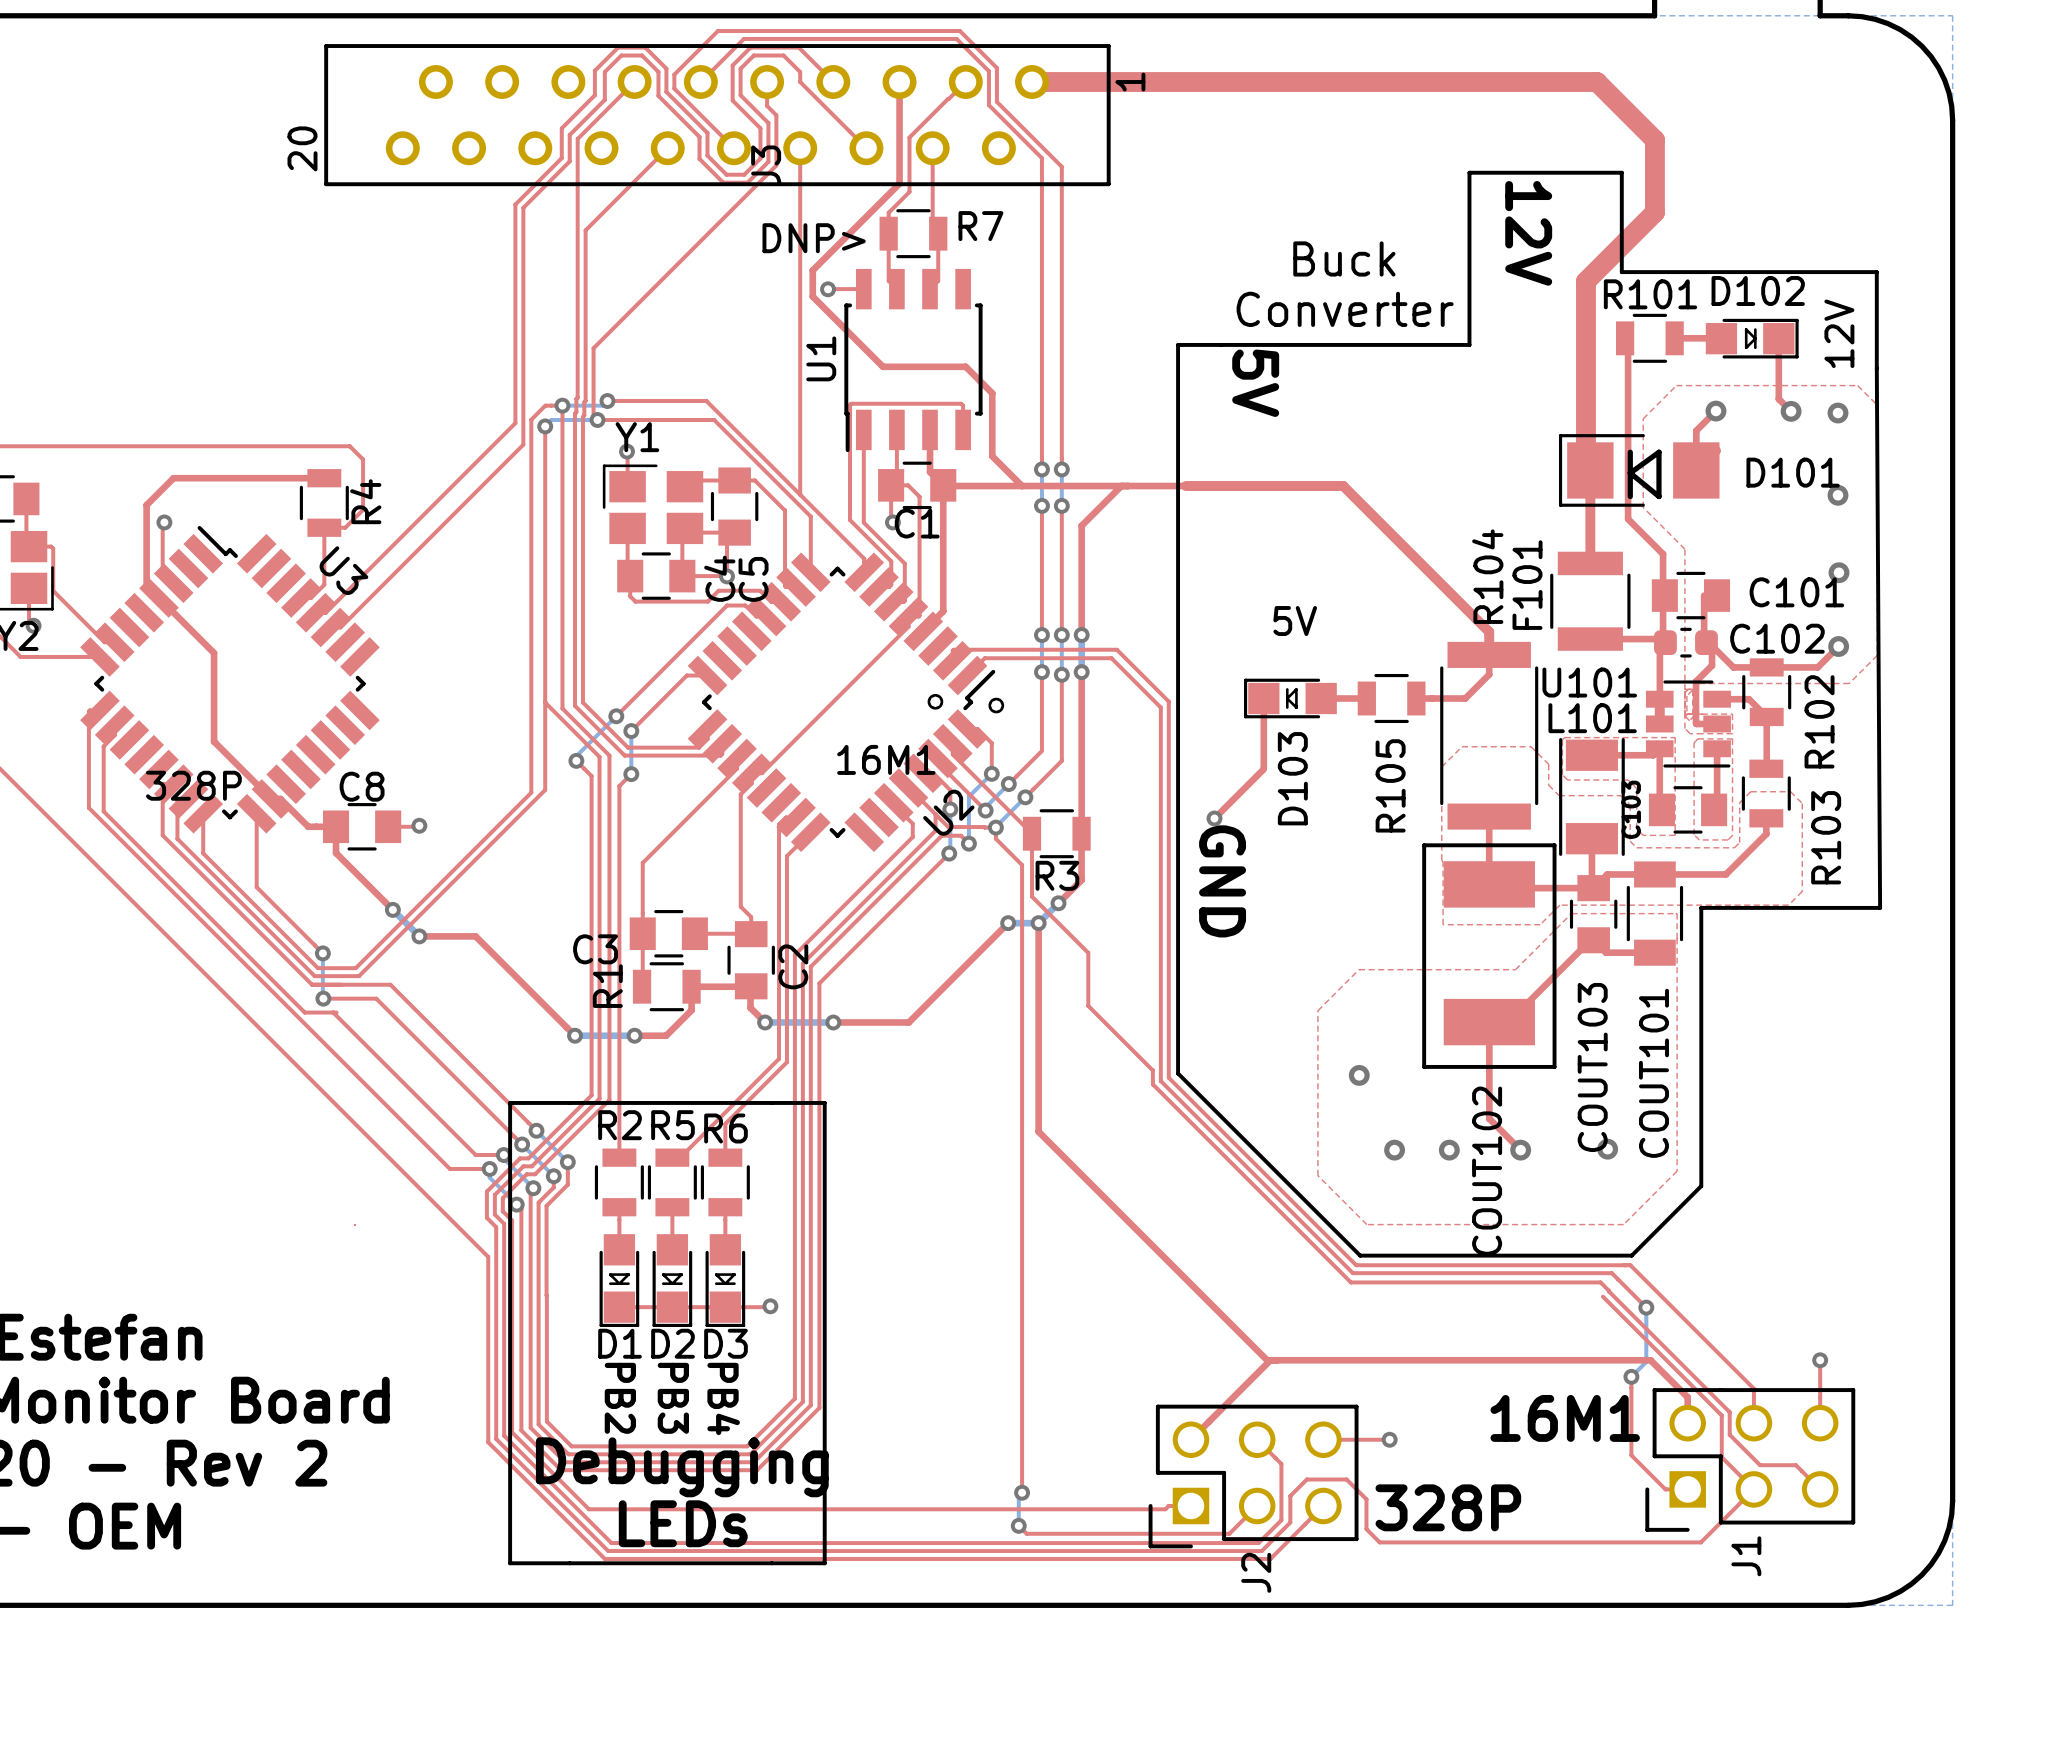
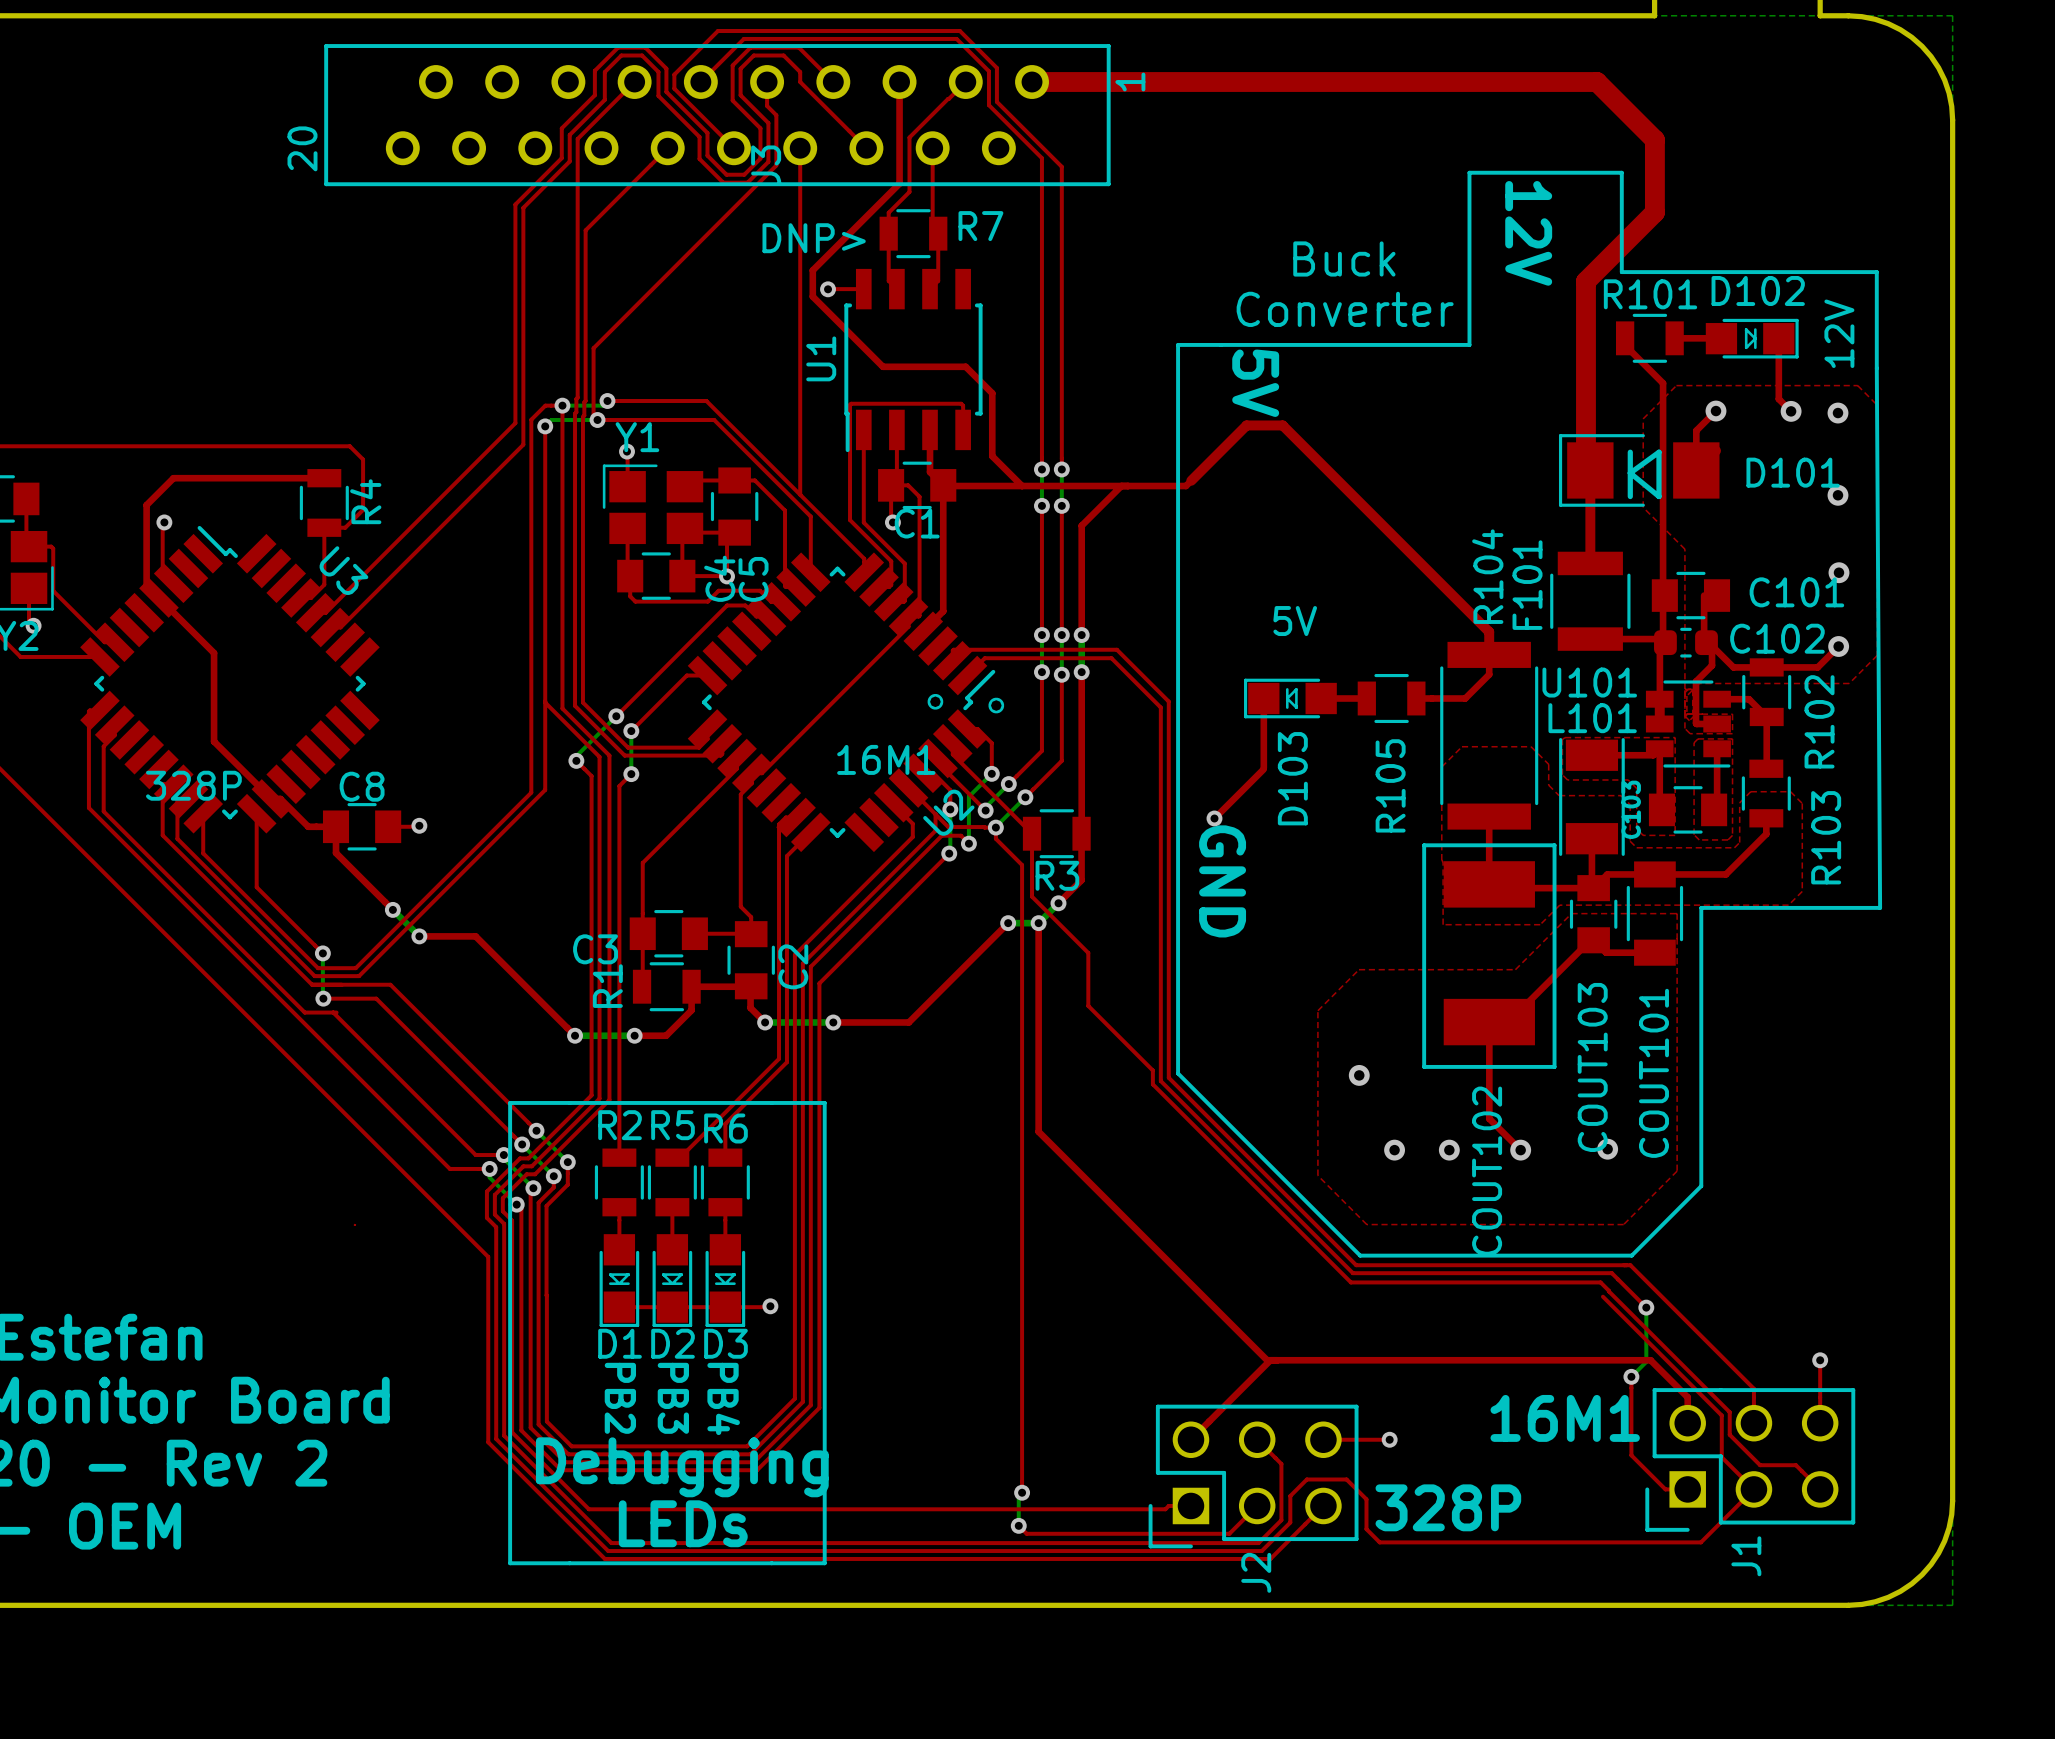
top track: (1628, 348) (1628, 519) (1663, 554) -> (1628, 348) (1663, 383) (1663, 554)
top track: (1186, 486) (1343, 486) -> (1186, 486) (1246, 425) (1282, 425) (1343, 486)

